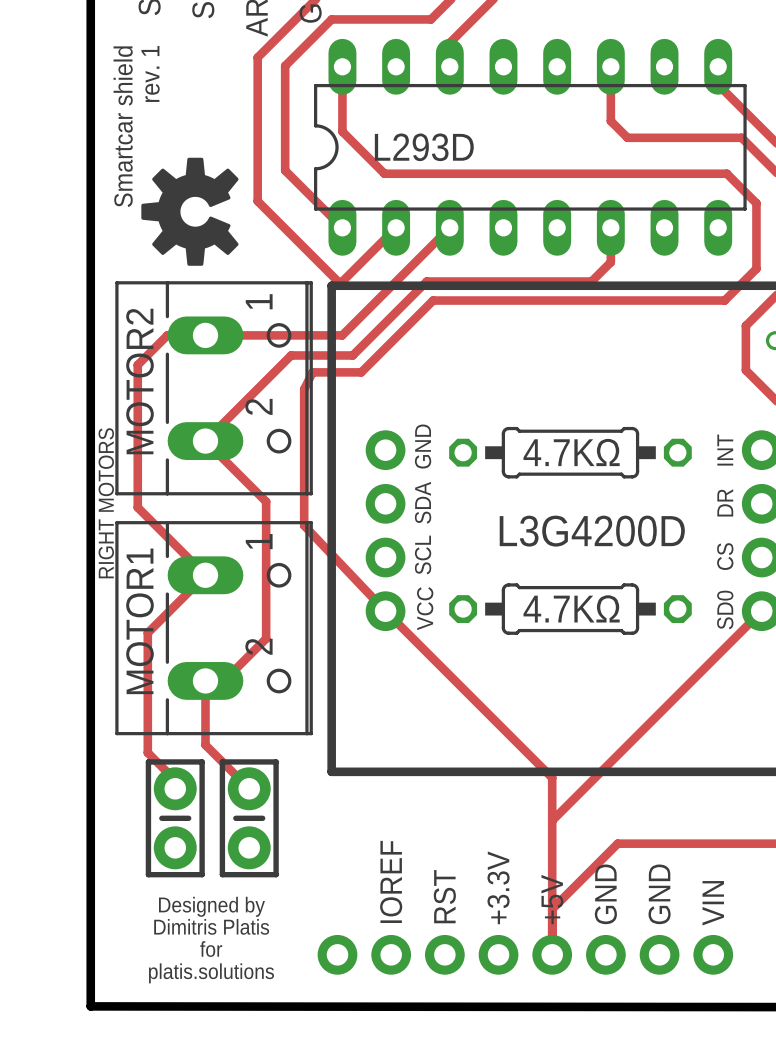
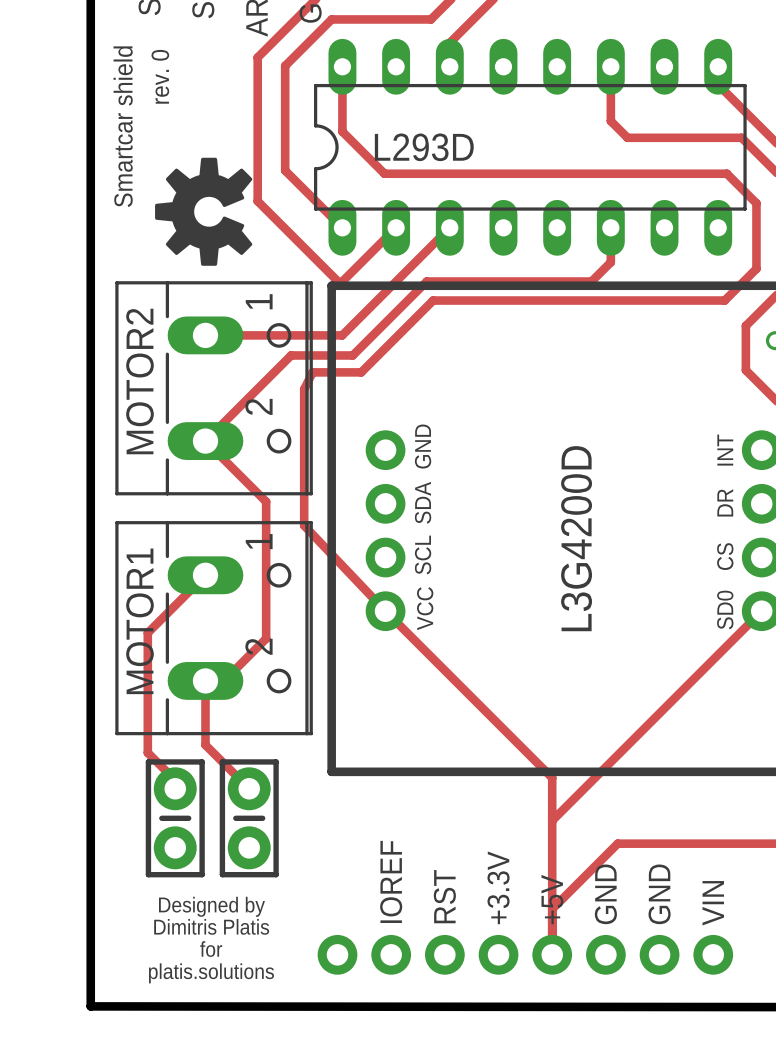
text: rev. 1 (150, 73) -> rev. 0 (160, 76)
drawing position: (189, 211) -> (203, 211)
track: (205, 335) (167, 335) (137, 364) (137, 507) (205, 575) -> none
part: 4.7KΩ (570, 452) -> none
text: RIGHT MOTORS (106, 503) -> none
text rotation: 0° (592, 531) -> 90° counterclockwise (576, 538)
part: 4.7KΩ (570, 609) -> none

